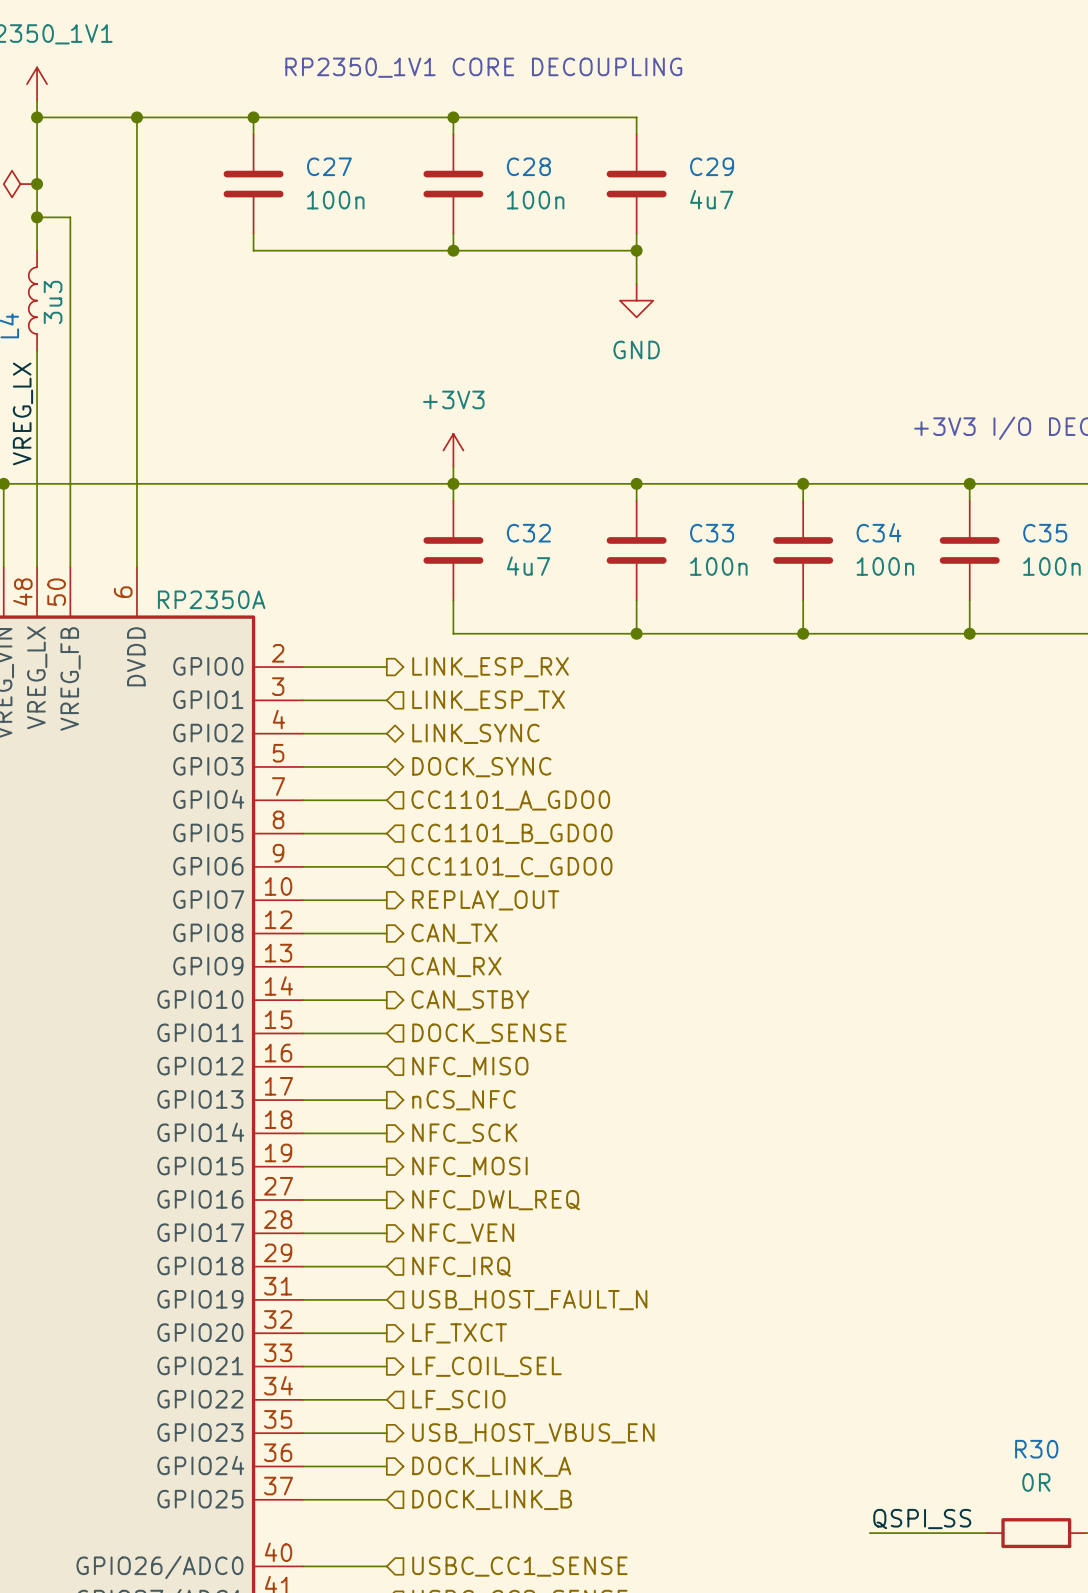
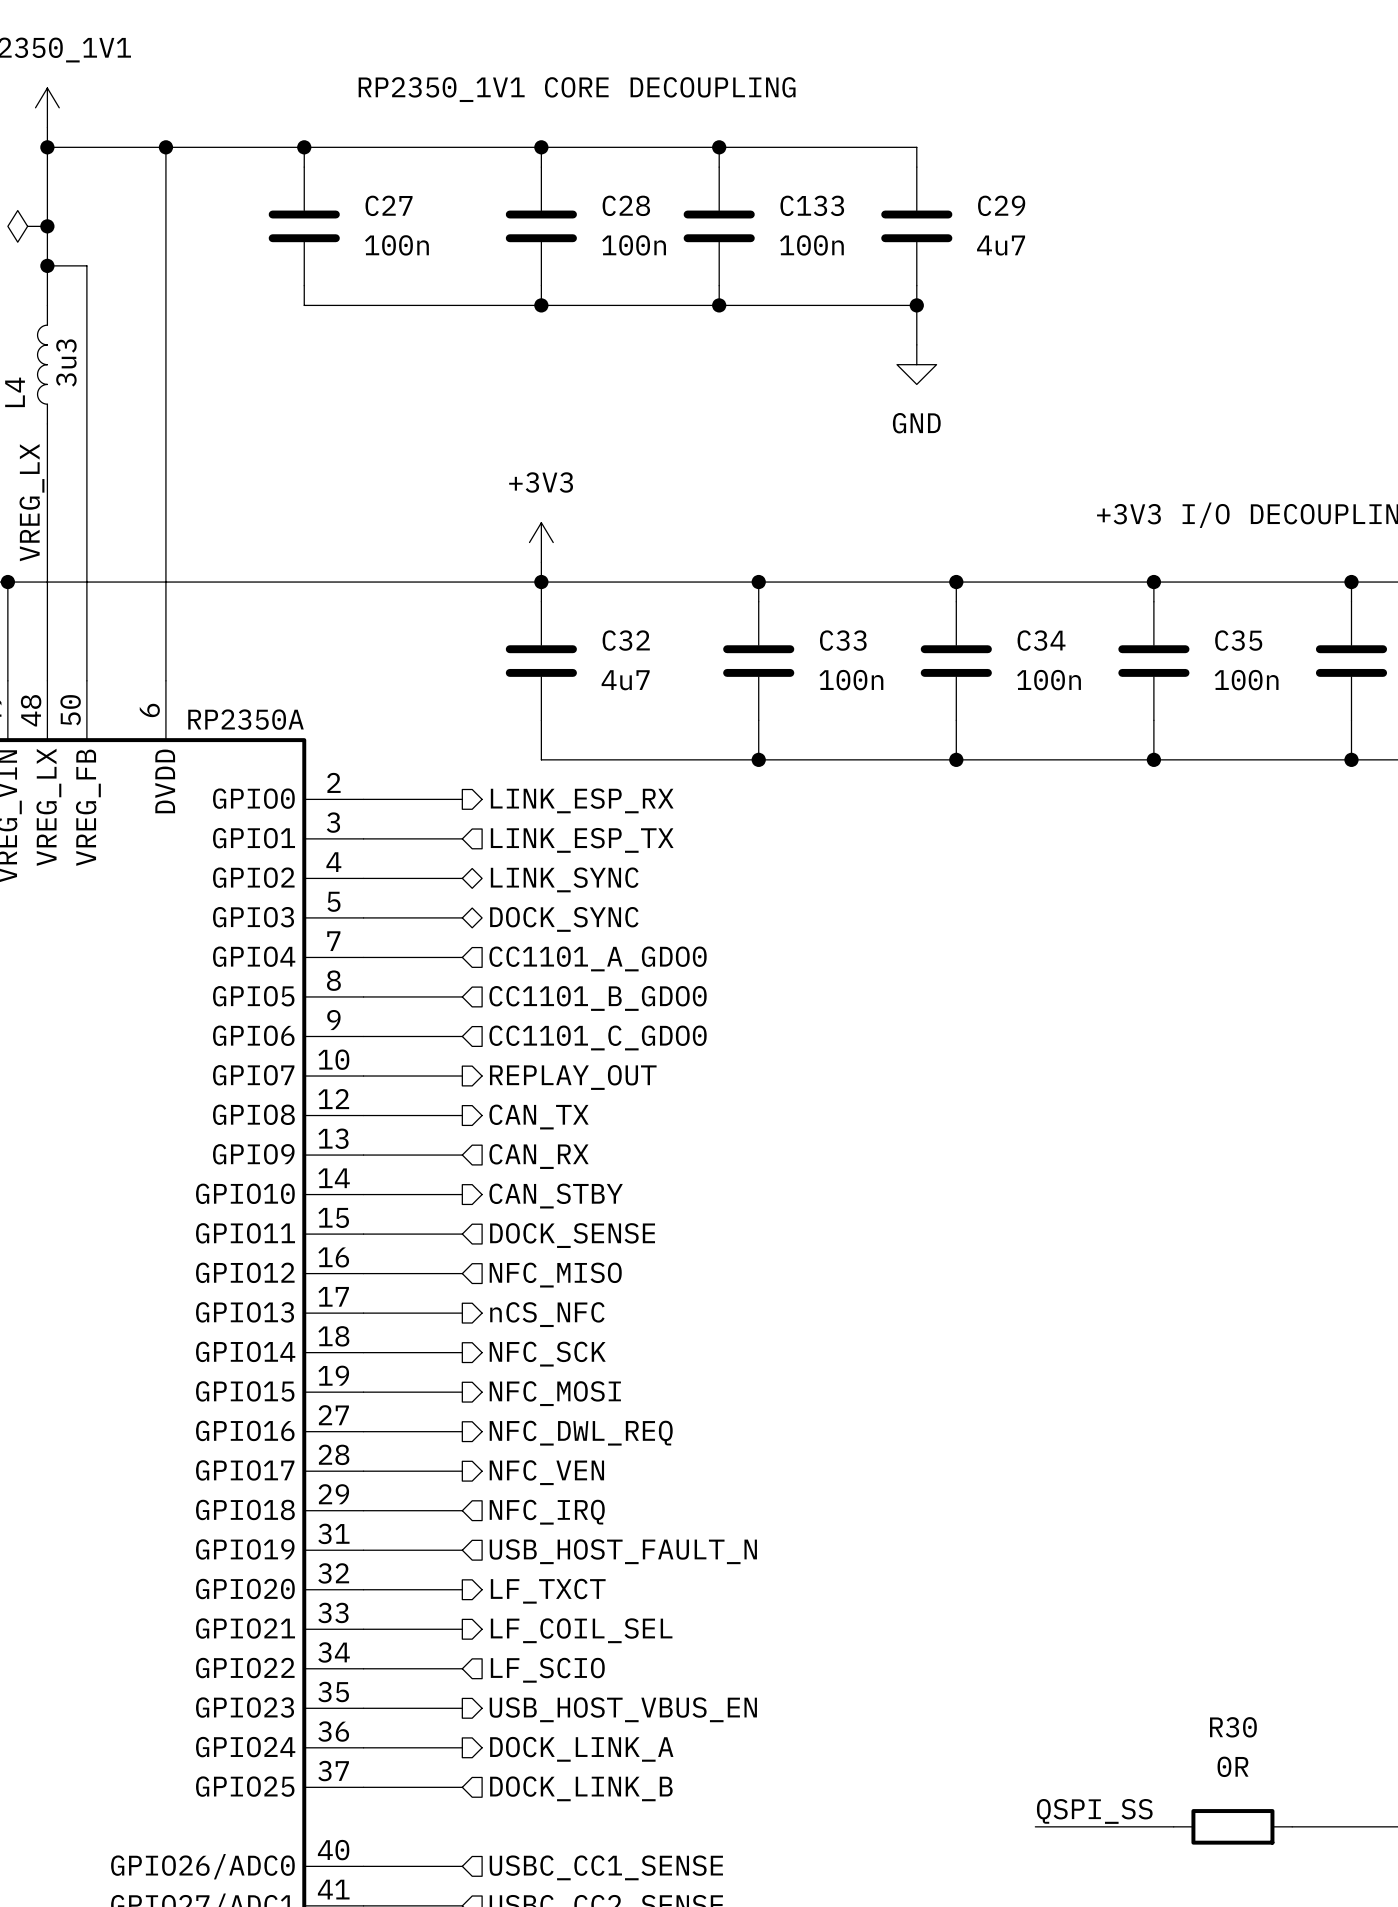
wire: none -> (719, 147) (719, 167)
junction: none -> (719, 147)
wire: (636, 117) (636, 134) -> (758, 147) (916, 147) (916, 167)
C133: none -> 100n (719, 226)
C29 position: (636, 184) -> (916, 226)
wire: none -> (719, 285) (719, 305)
wire: (636, 234) (636, 283) -> (916, 285) (916, 344)
wire: none -> (758, 305) (916, 305)
junction position: (636, 250) -> (719, 305)
junction: none -> (916, 305)
power symbol position: GND (636, 300) -> GND (916, 364)

